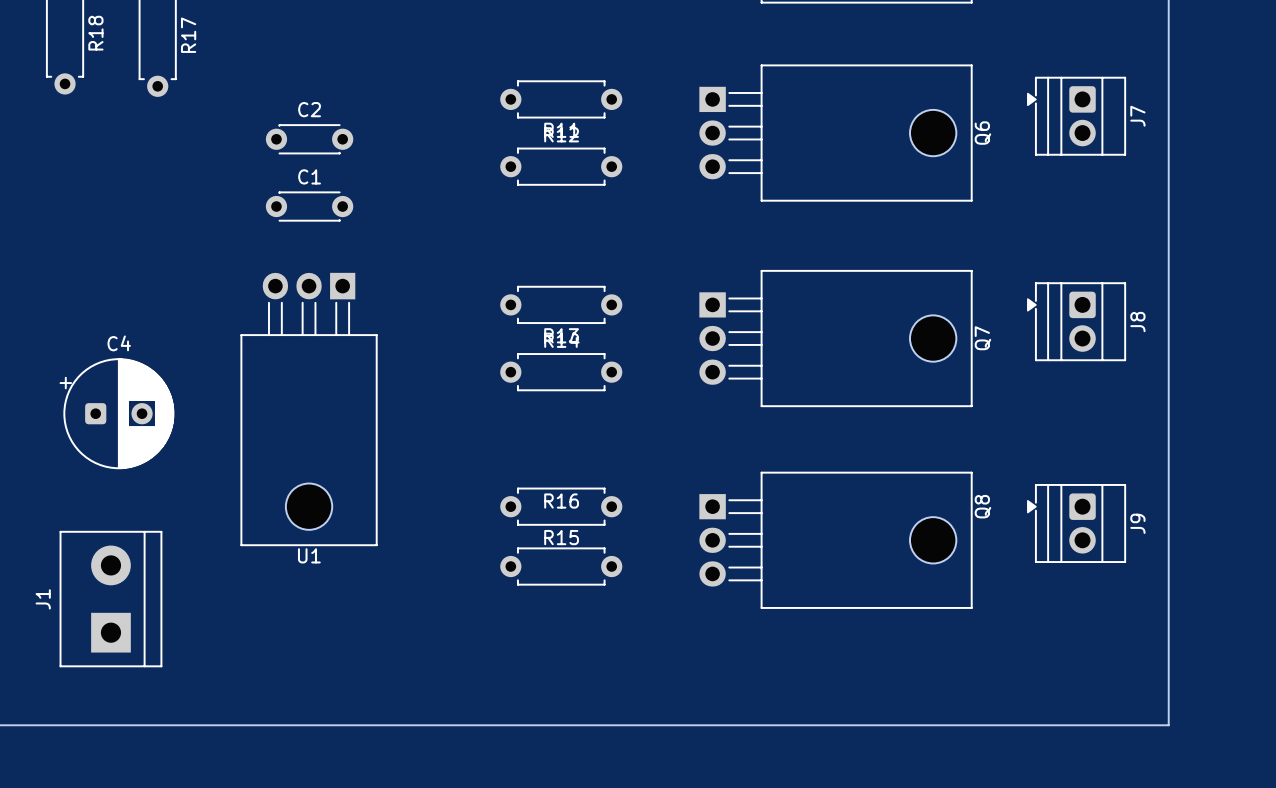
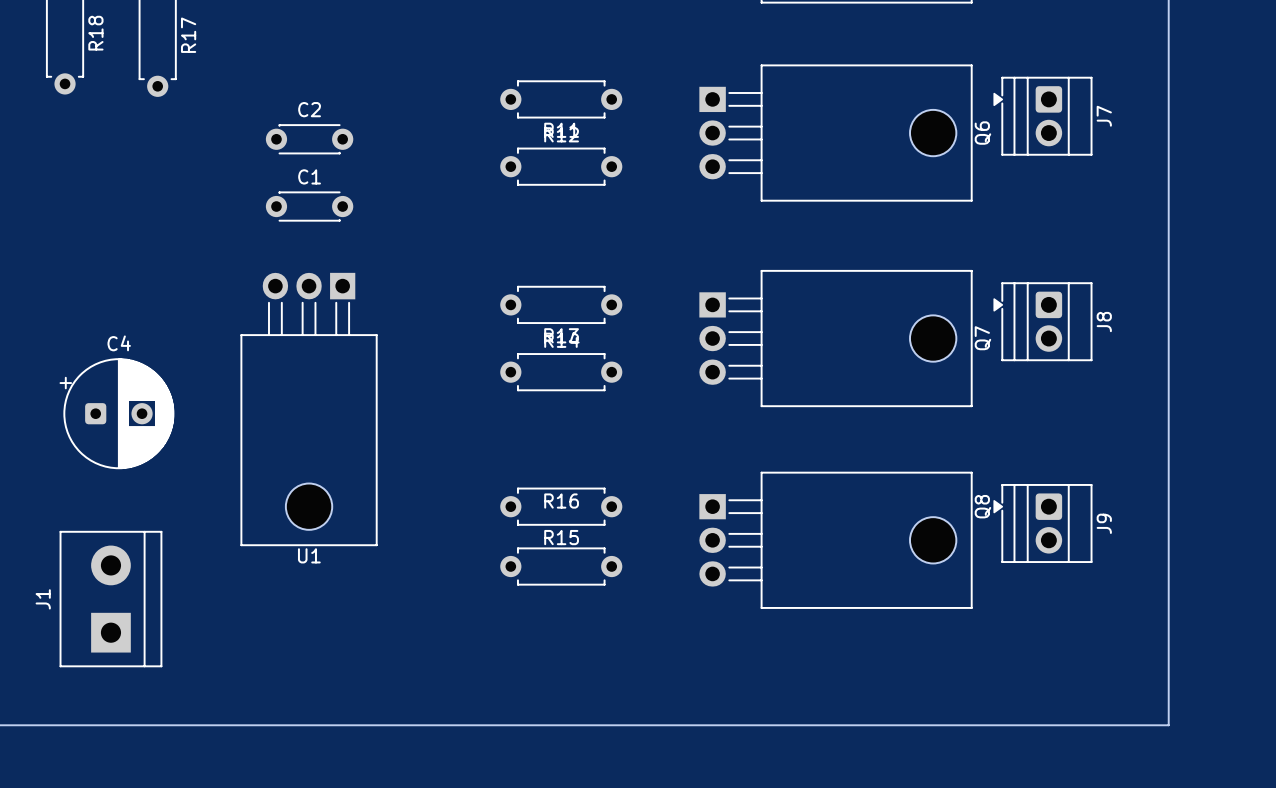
J7 position: (1076, 116) -> (1042, 116)
J8 position: (1076, 321) -> (1042, 321)
J9 position: (1076, 523) -> (1042, 523)

